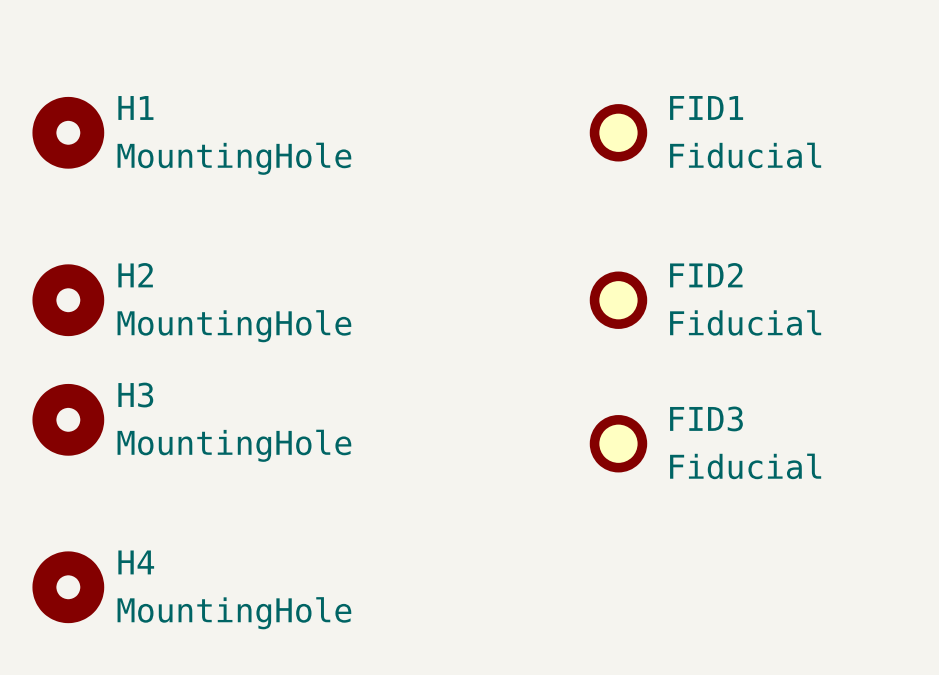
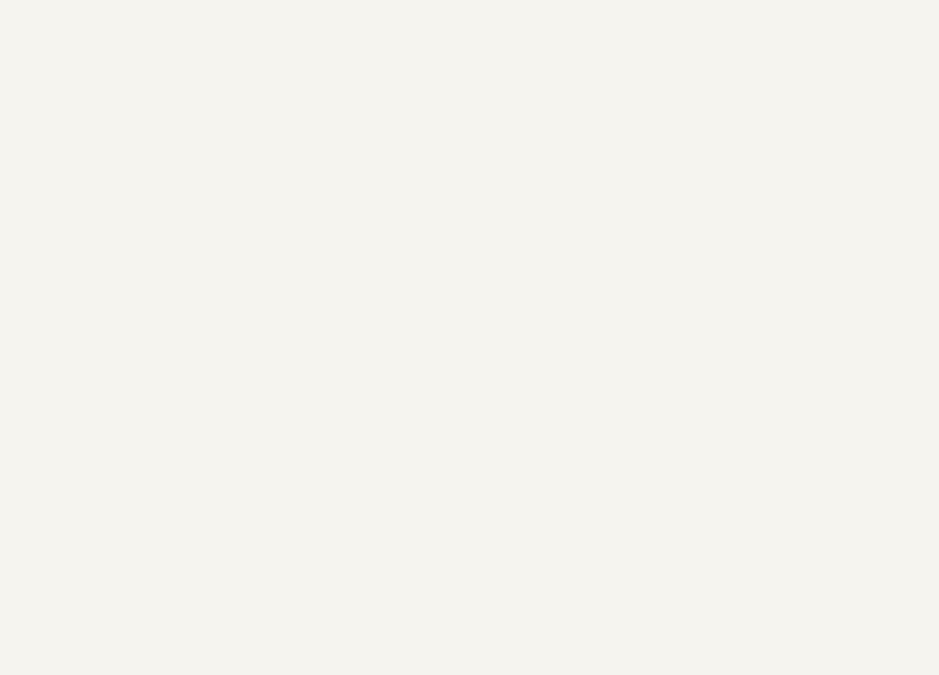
H1: MountingHole (68, 132) -> none
FID1: Fiducial (618, 132) -> none
H2: MountingHole (68, 300) -> none
FID2: Fiducial (618, 300) -> none
H3: MountingHole (68, 419) -> none
FID3: Fiducial (618, 443) -> none
H4: MountingHole (68, 587) -> none

